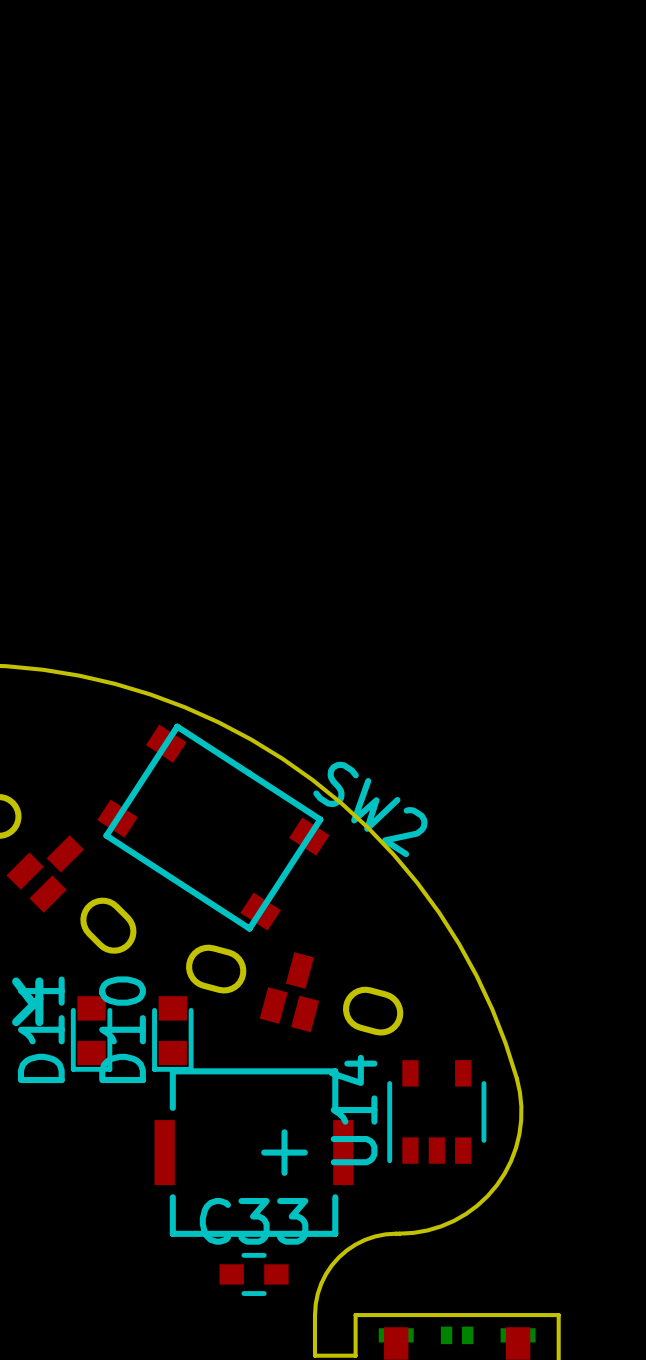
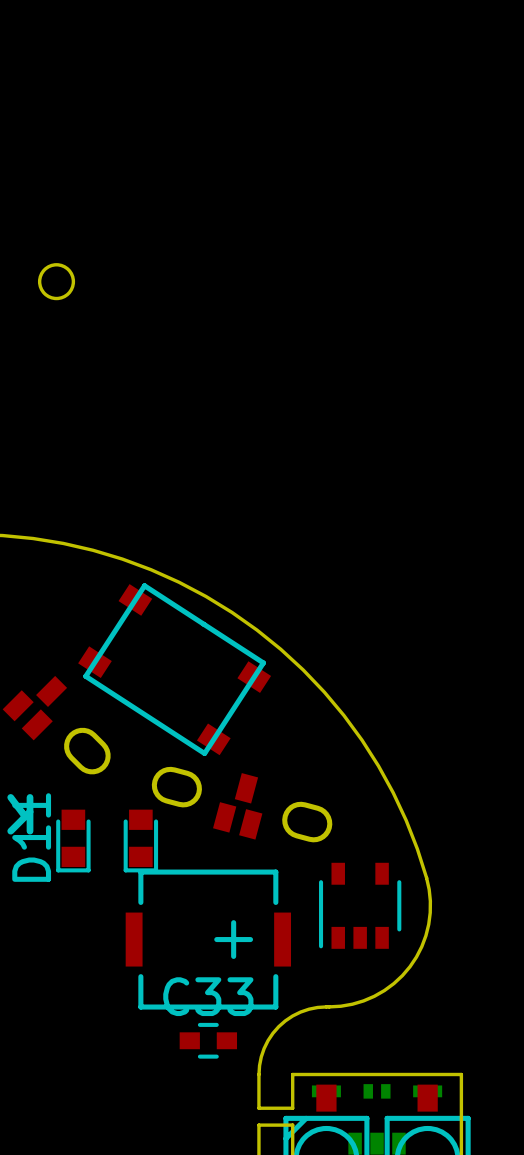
round board edge: none -> [37, 263, 76, 301]
SW2 name: SW2 (370, 809) -> none
D10 name: D10 (122, 1029) -> none
U14 name: U14 (353, 1110) -> none

